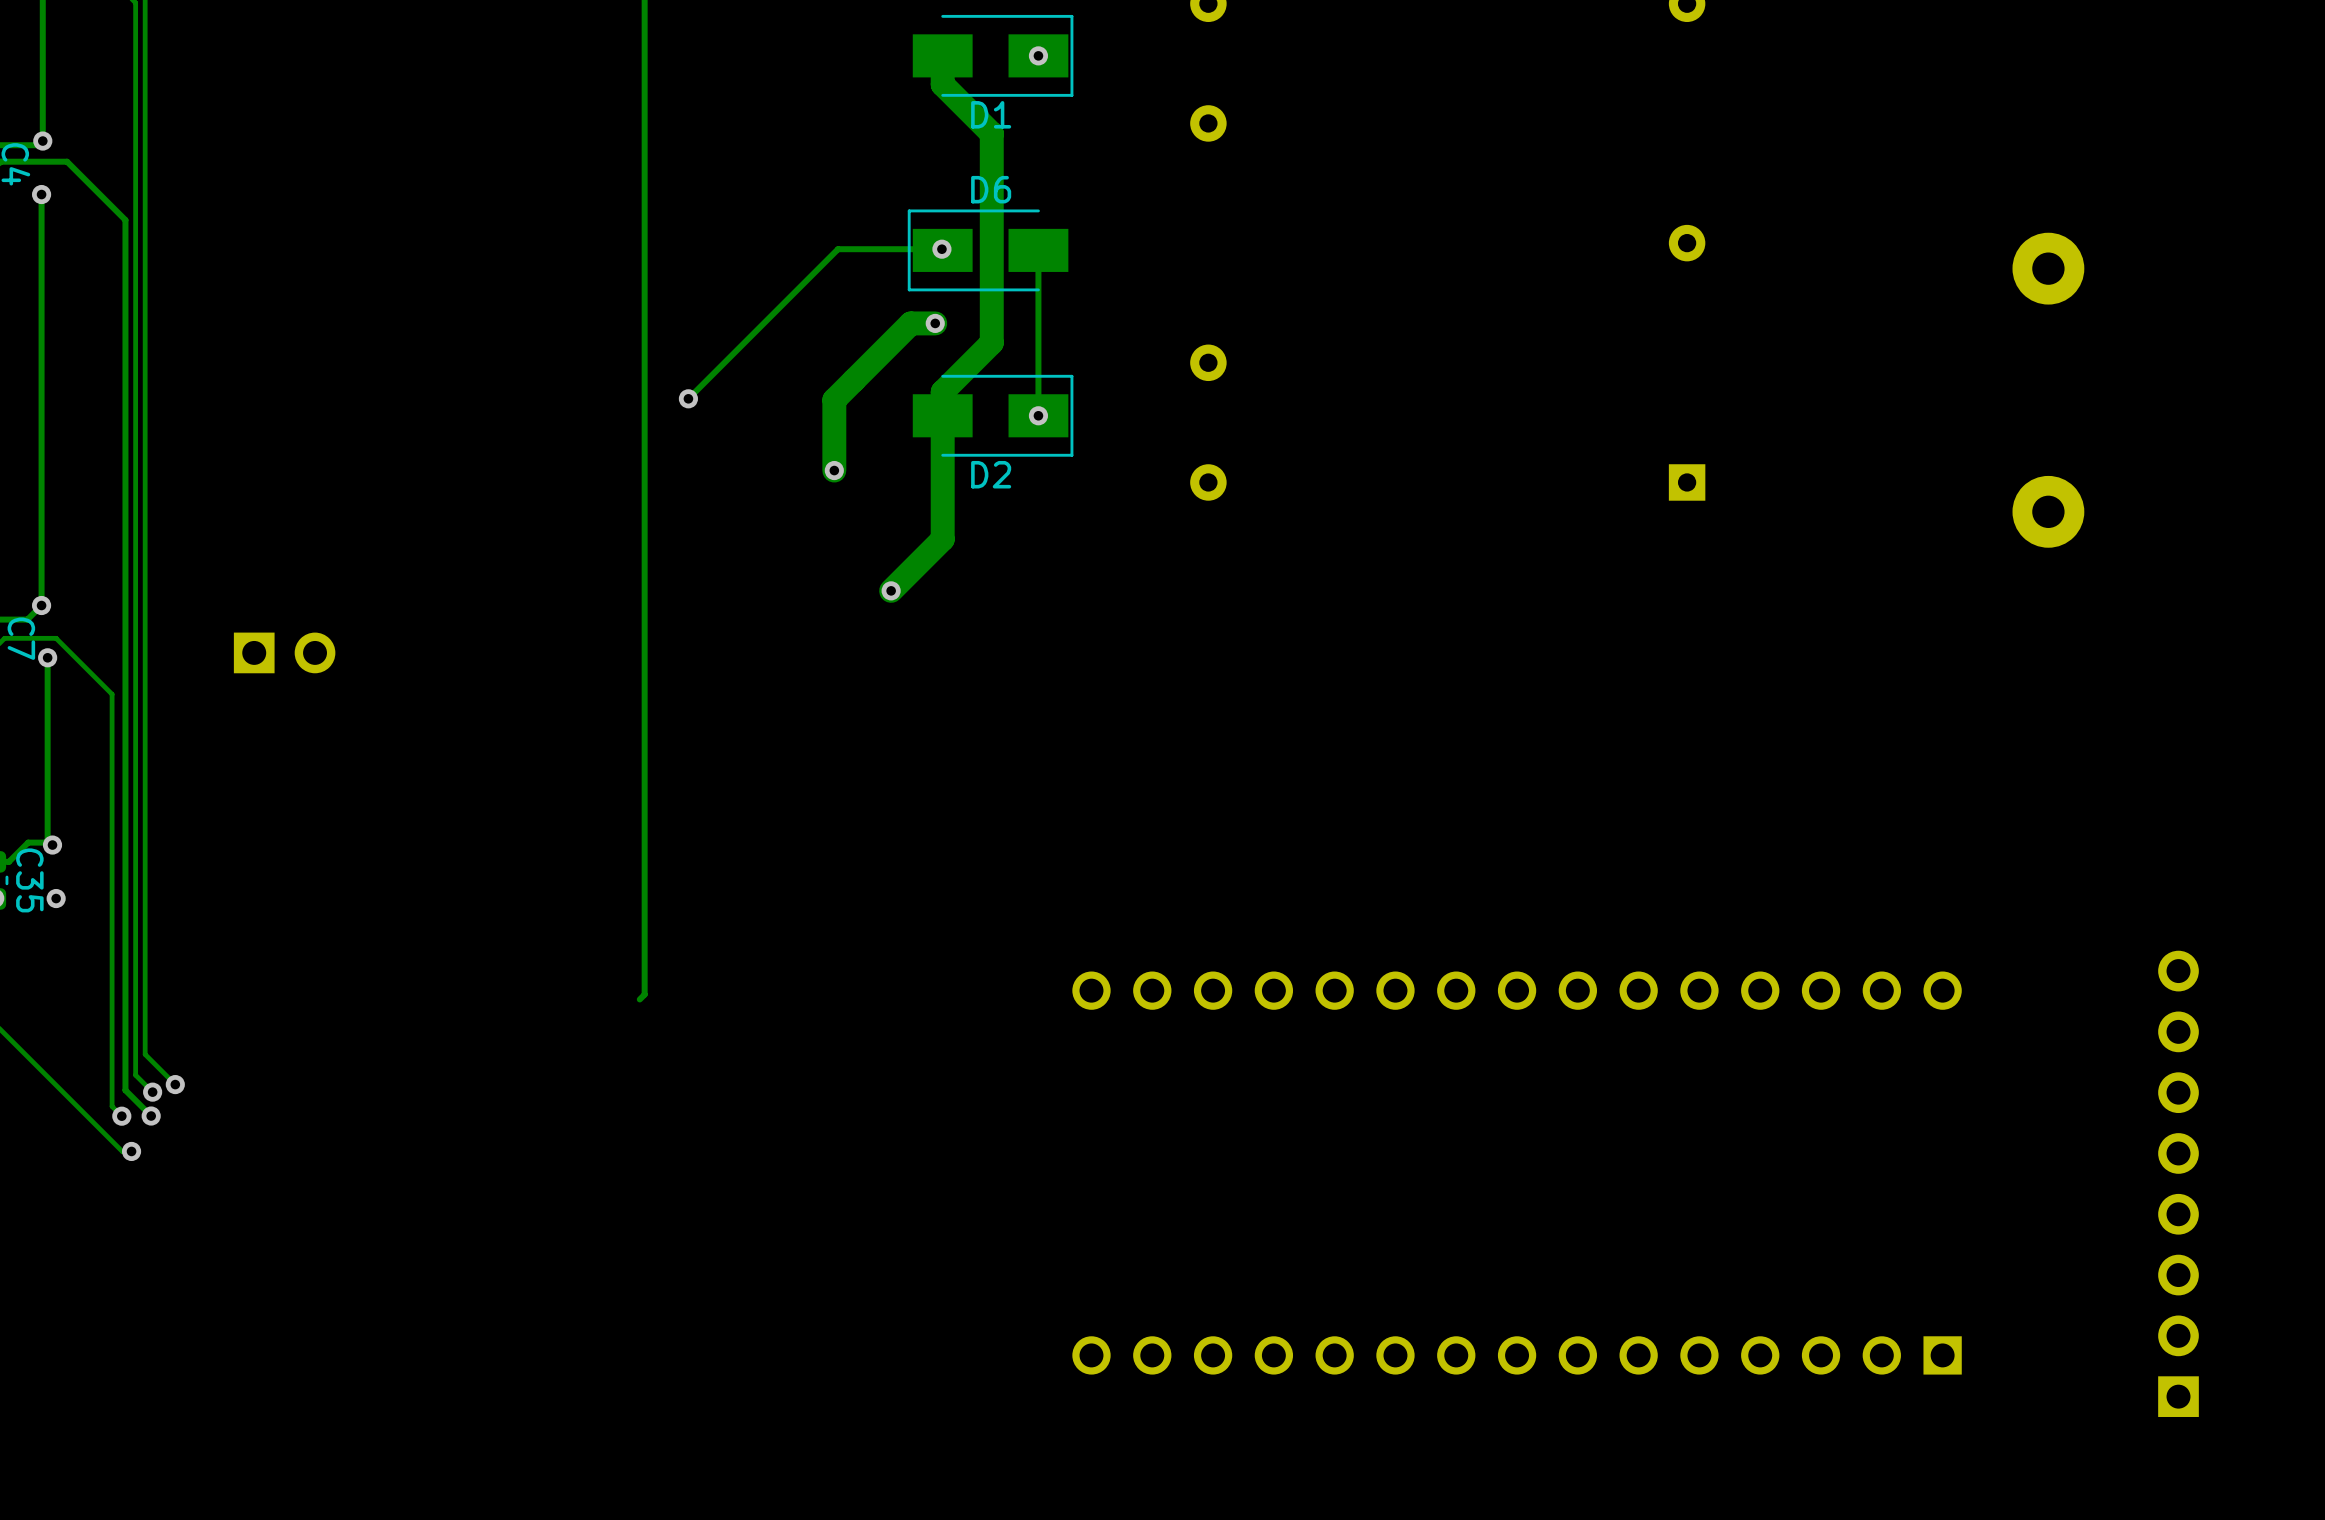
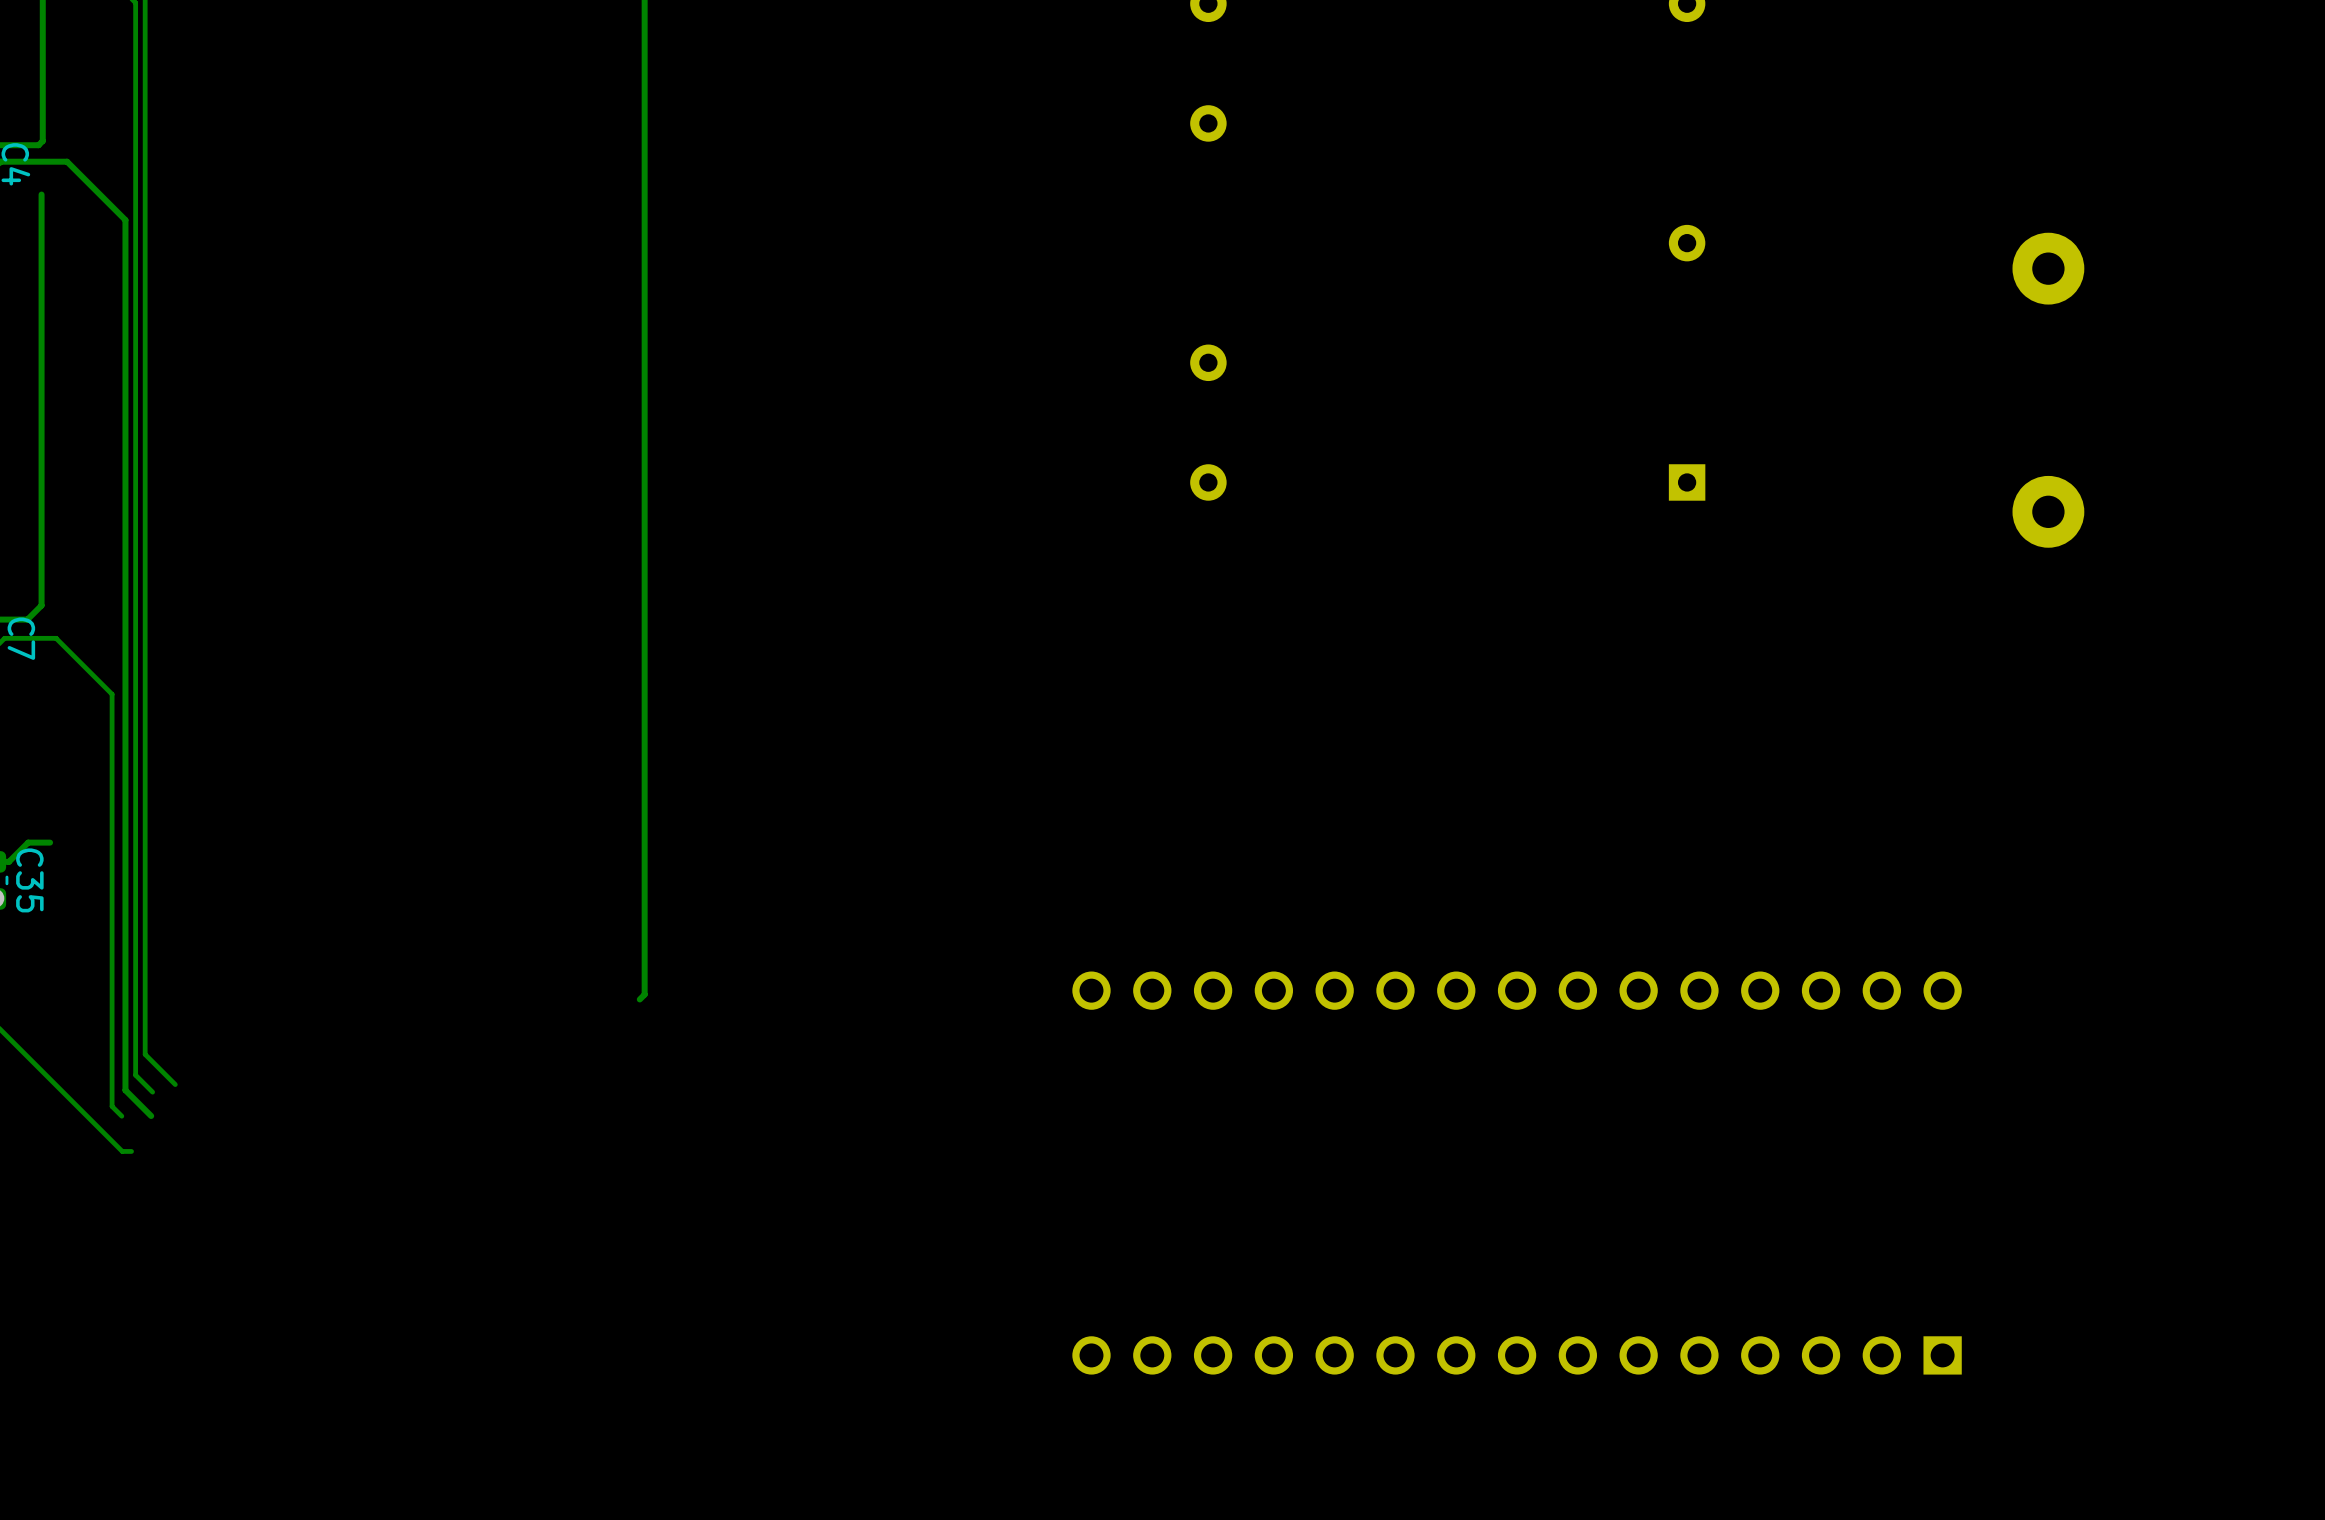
track: (942, 55) (942, 84) (991, 133) (991, 342) (942, 391) (942, 539) (891, 590) (946, 535) (946, 415) -> none
D1: (993, 55) -> none
via: (1038, 55) -> none
via: (42, 141) -> none
via: (41, 194) -> none
track: (941, 249) (838, 249) (688, 398) -> none
via: (941, 249) -> none
D6: (988, 250) -> none
track: (1038, 250) (1038, 415) -> none
track: (935, 323) (910, 323) (834, 400) (834, 470) -> none
via: (935, 323) -> none
via: (688, 398) -> none
D2: (993, 415) -> none
via: (1038, 415) -> none
via: (834, 470) -> none
via: (891, 590) -> none
via: (41, 605) -> none
part: (284, 652) -> none
track: (47, 657) (47, 840) (52, 845) -> none
via: (47, 657) -> none
via: (52, 845) -> none
via: (56, 898) -> none
via: (175, 1084) -> none
via: (152, 1092) -> none
via: (121, 1116) -> none
via: (151, 1116) -> none
via: (131, 1151) -> none
part: (2178, 1183) -> none

